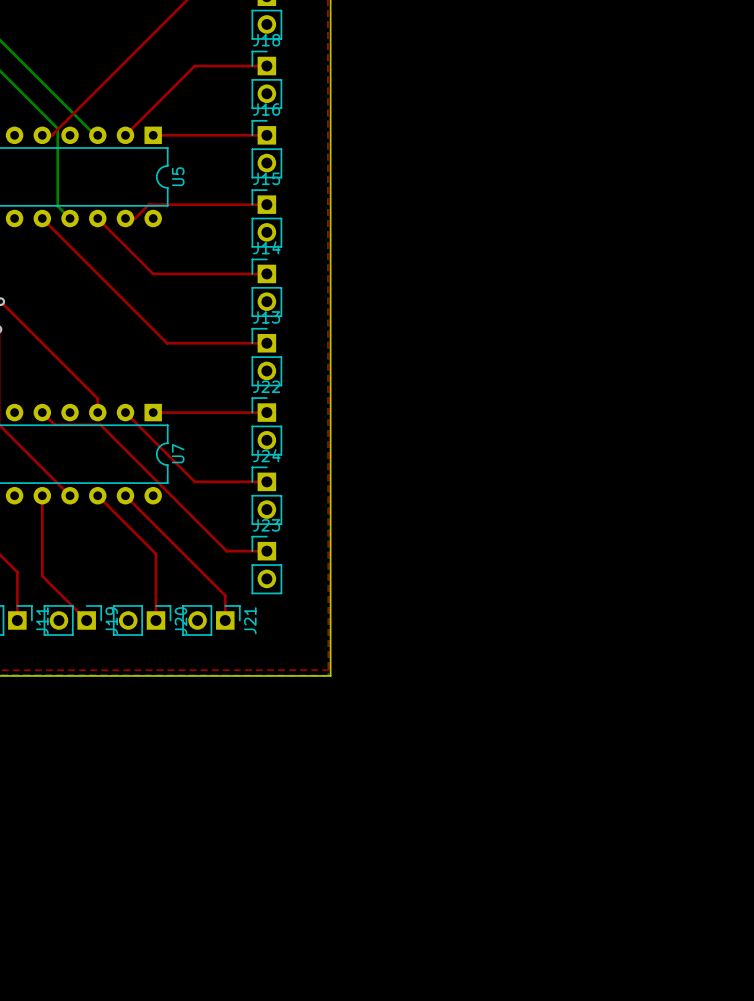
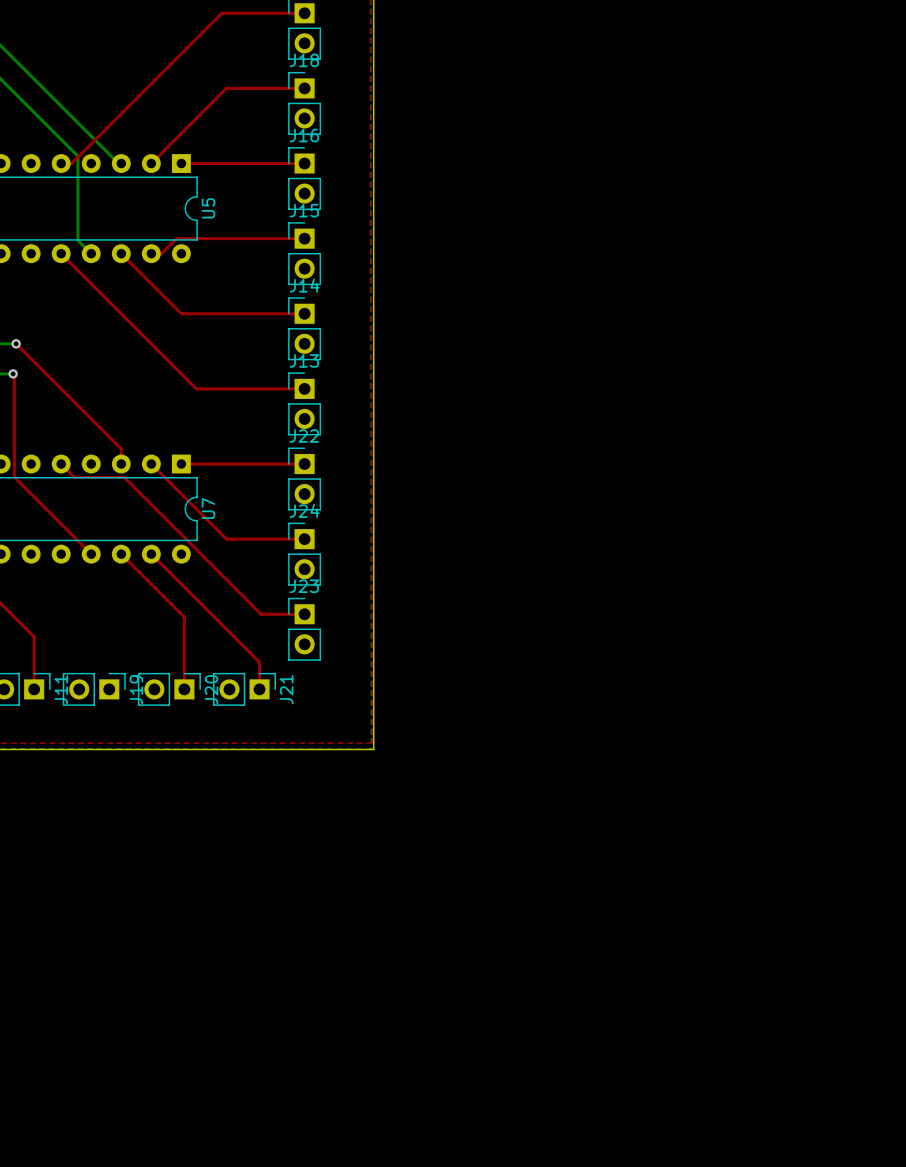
top track: (42, 495) (42, 576) (86, 620) -> none

